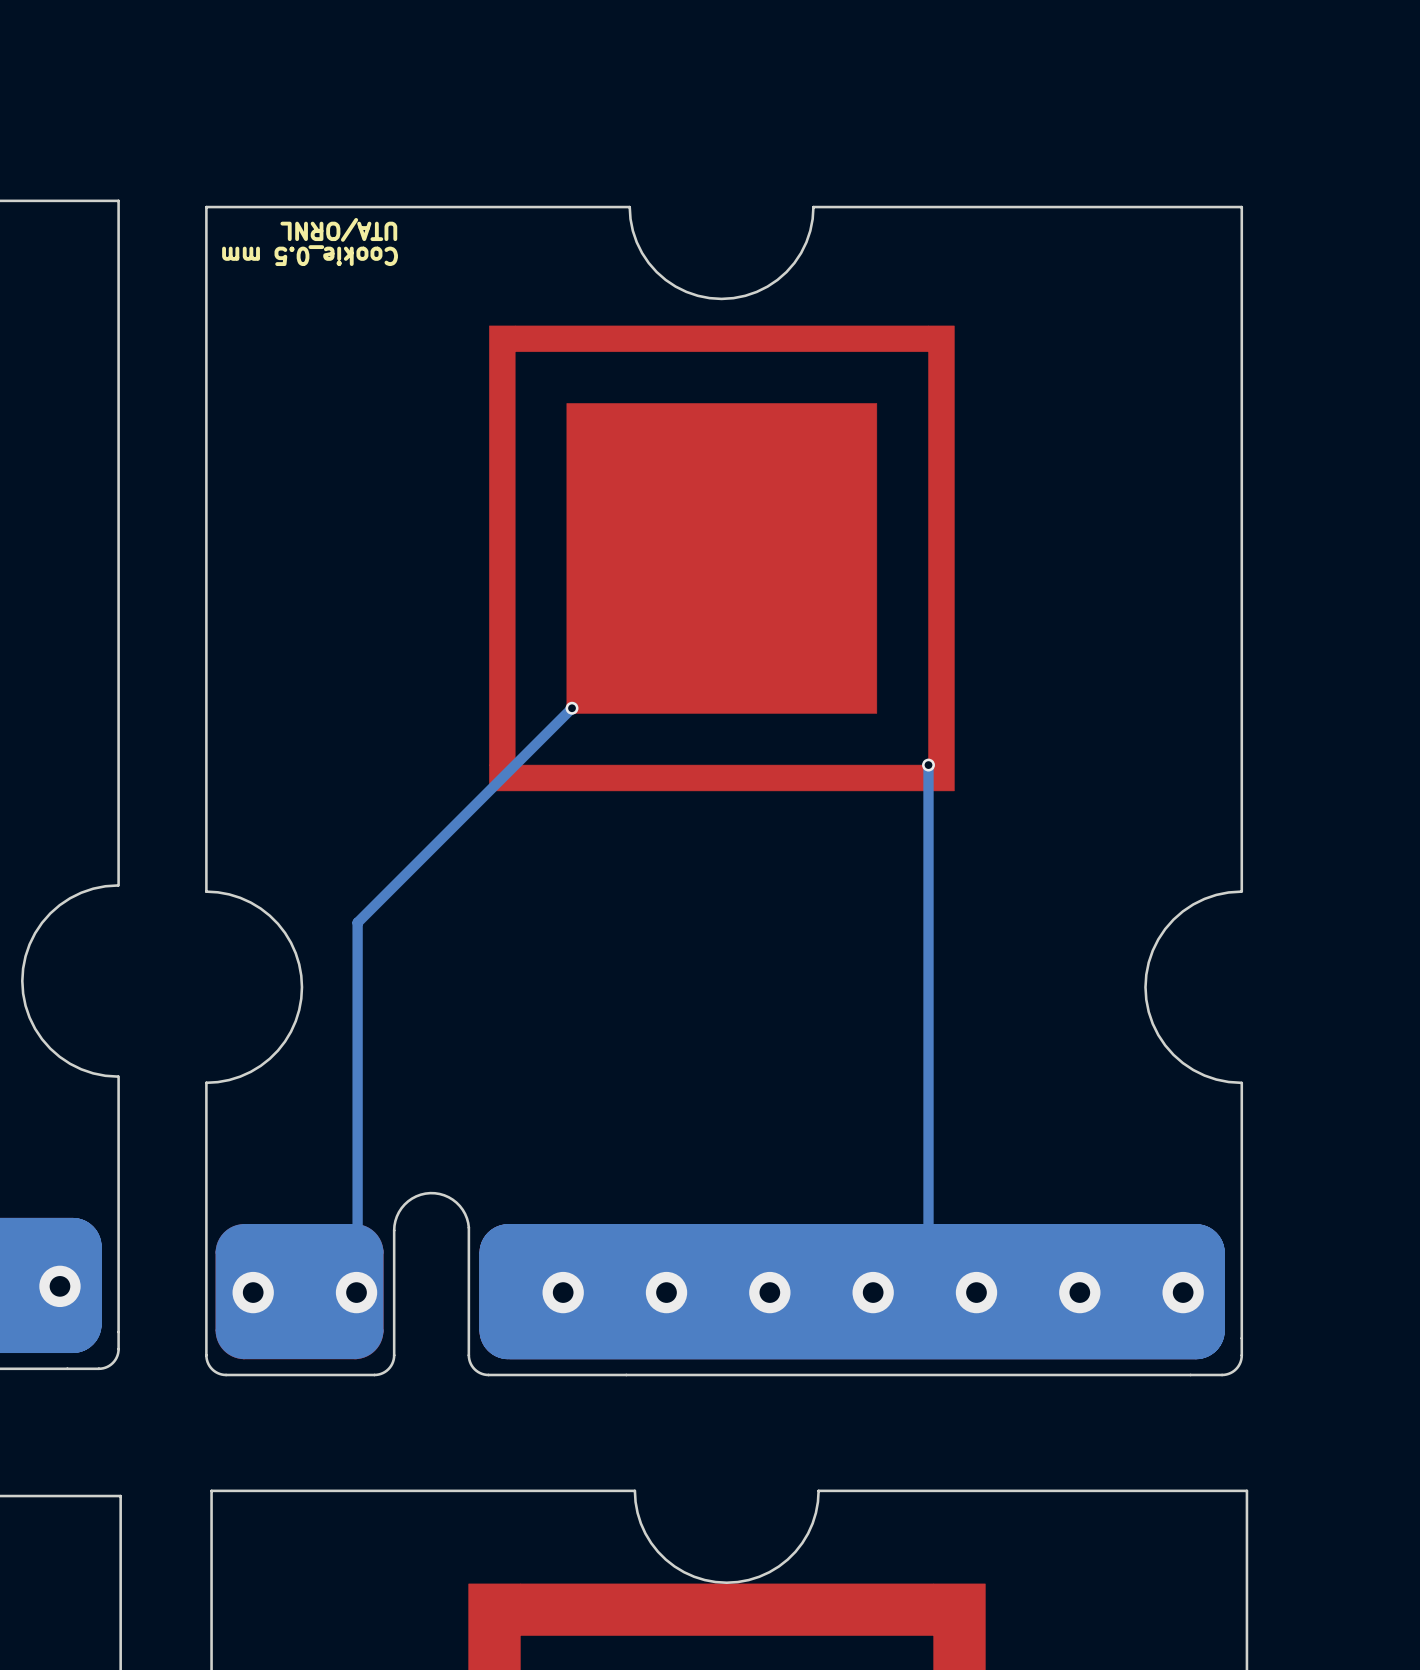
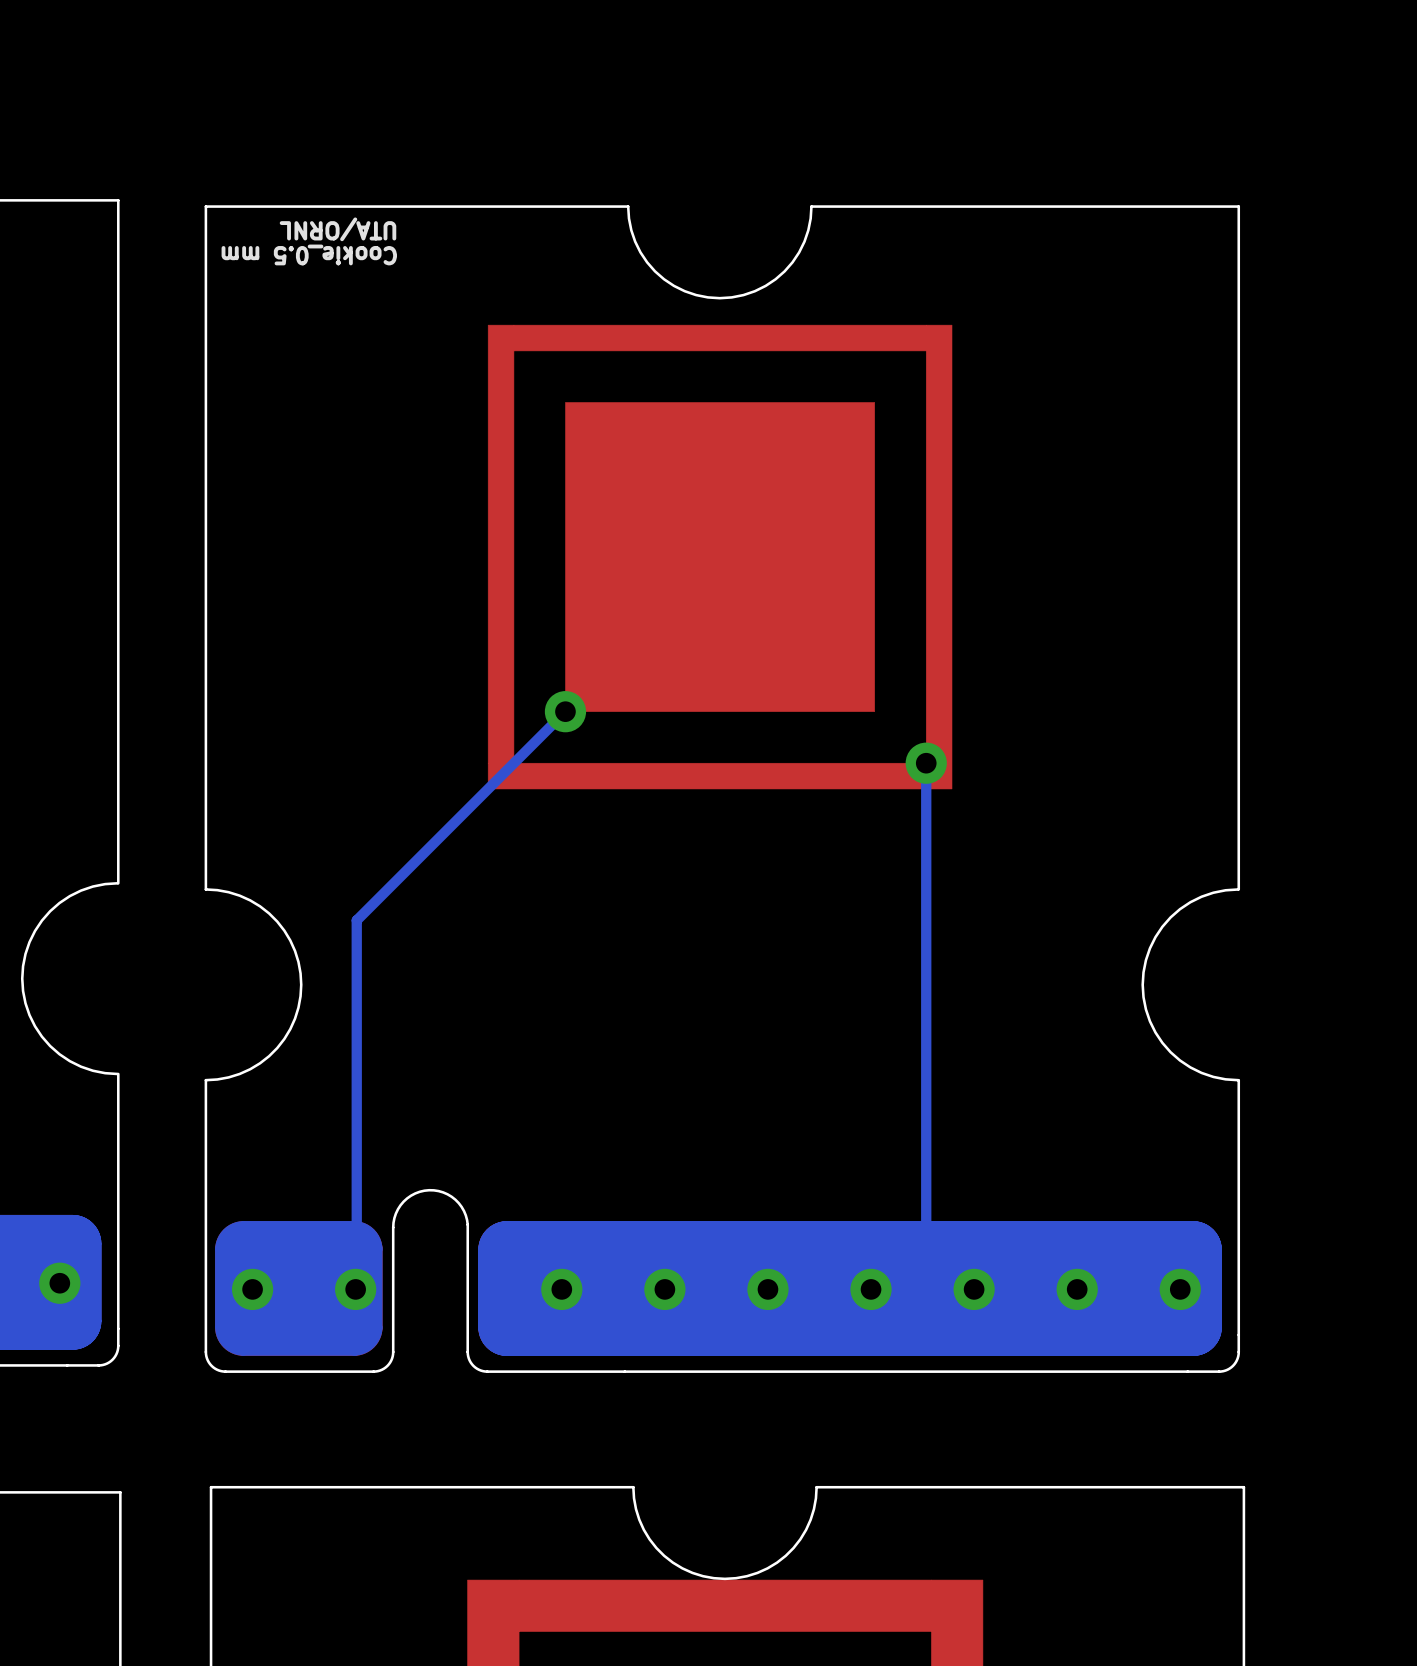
via size: [565, 701, 579, 715] -> [544, 691, 587, 733]
via size: [922, 758, 935, 772] -> [905, 742, 947, 784]

